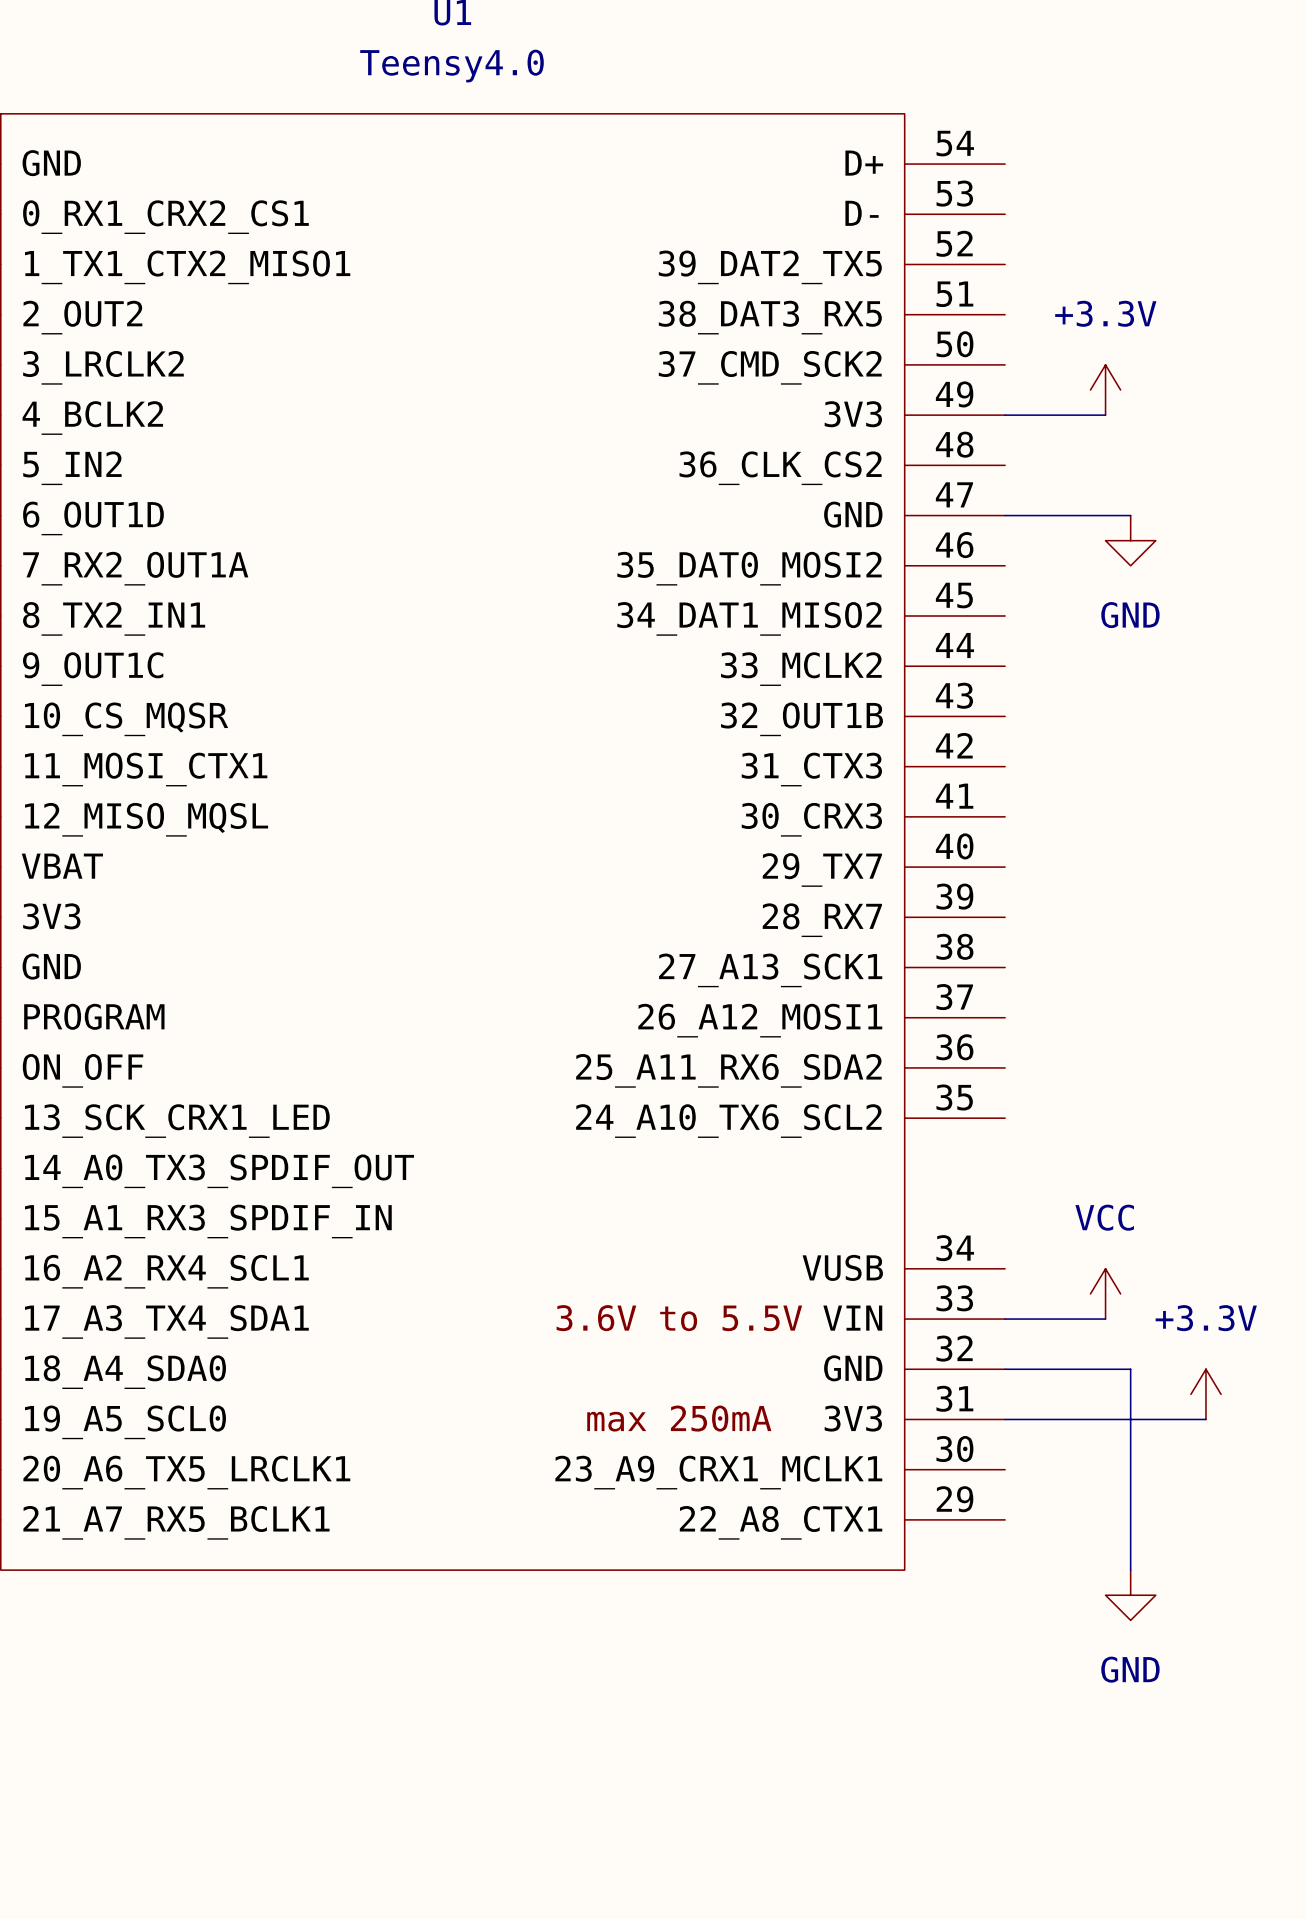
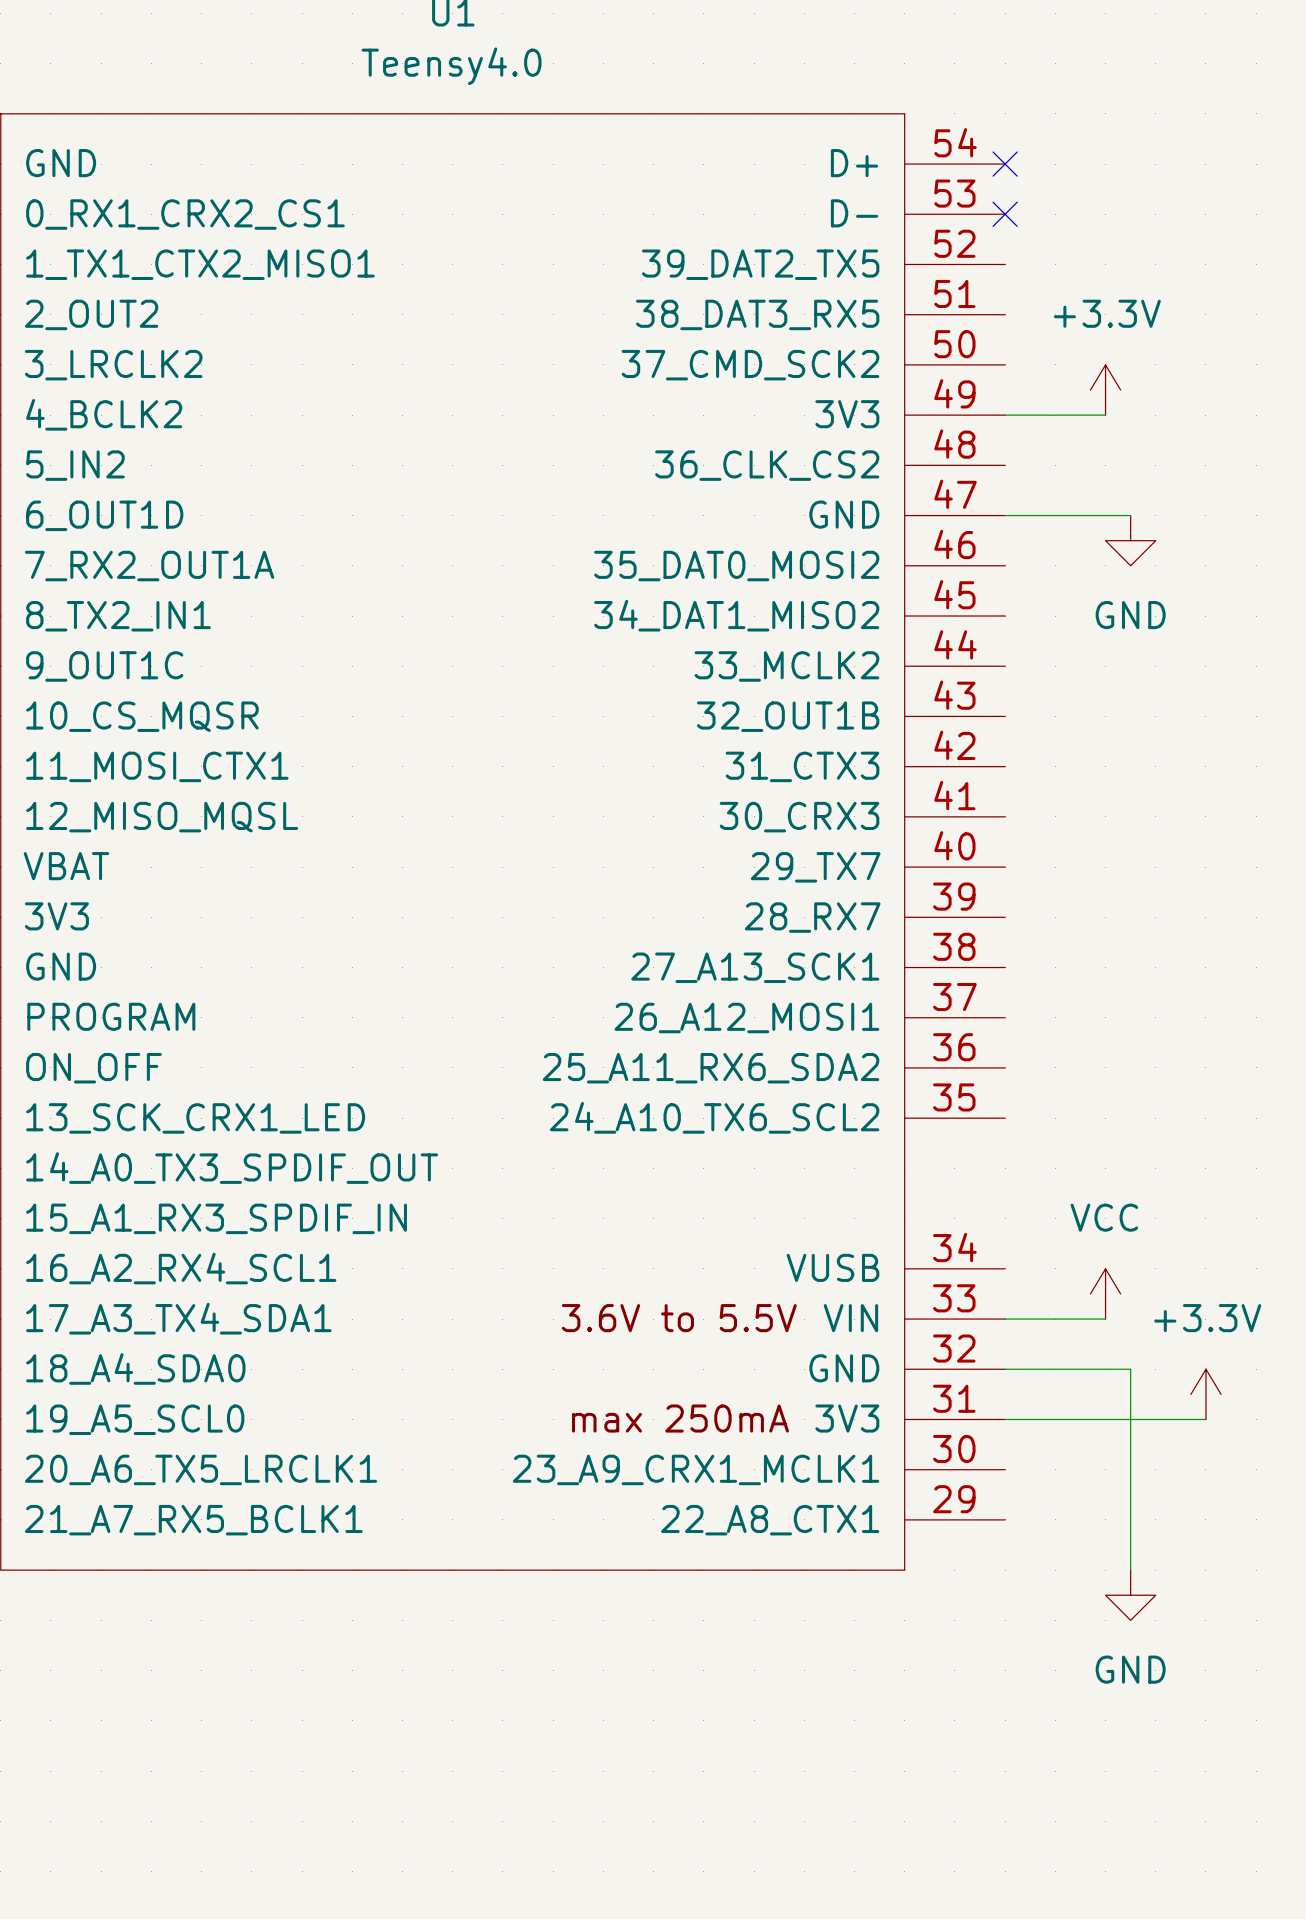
no-connect mark: none -> (1005, 164)
no-connect mark: none -> (1005, 214)

